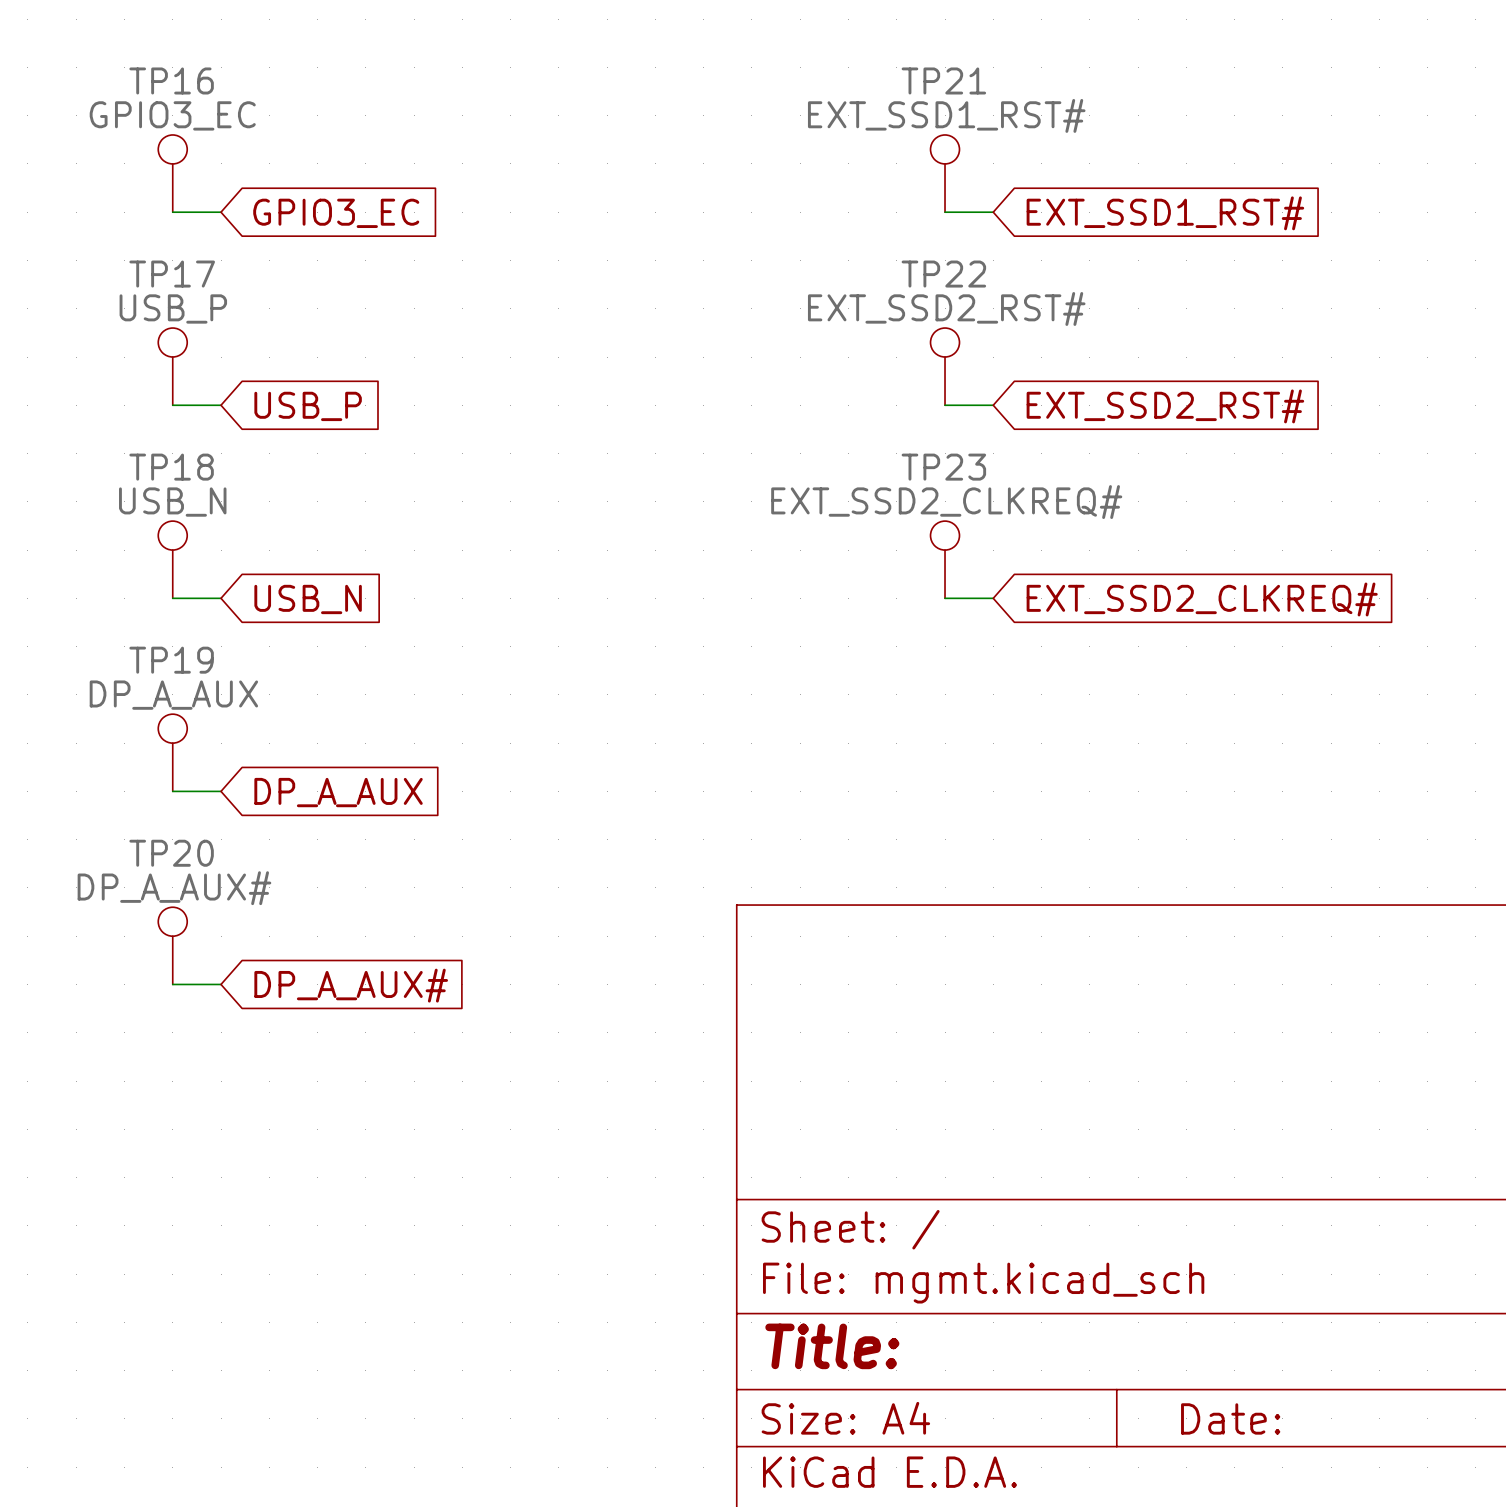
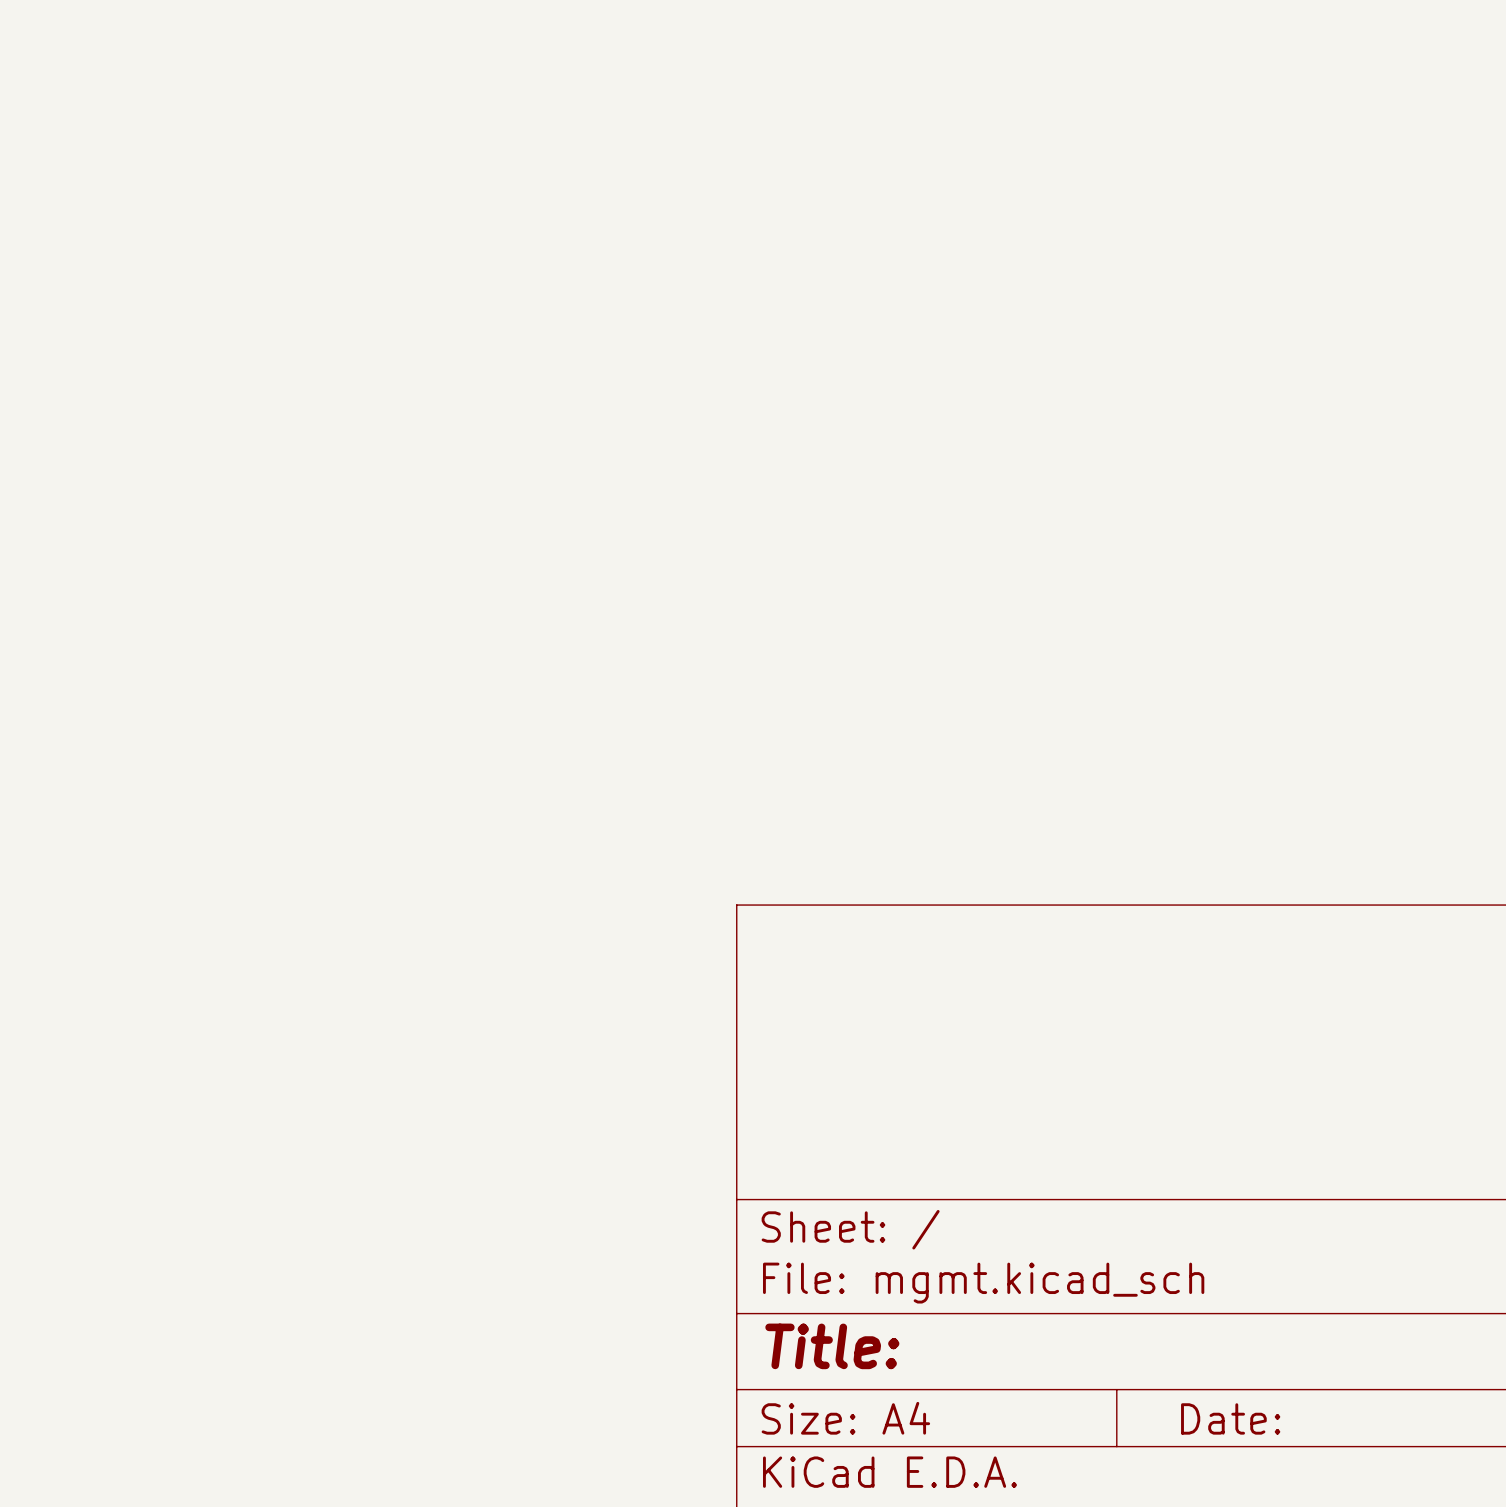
TP16: GPIO3_EC (172, 173) -> none
TP21: EXT_SSD1_RST# (945, 173) -> none
wire: (172, 212) (221, 212) -> none
wire: (945, 212) (993, 212) -> none
global label: GPIO3_EC (336, 213) -> none
global label: EXT_SSD1_RST# (1165, 213) -> none
TP17: USB_P (172, 366) -> none
TP22: EXT_SSD2_RST# (945, 366) -> none
wire: (172, 405) (221, 405) -> none
wire: (945, 405) (993, 405) -> none
global label: USB_P (308, 406) -> none
global label: EXT_SSD2_RST# (1165, 406) -> none
TP18: USB_N (172, 559) -> none
TP23: EXT_SSD2_CLKREQ# (945, 559) -> none
wire: (172, 598) (221, 598) -> none
wire: (945, 598) (993, 598) -> none
global label: USB_N (308, 599) -> none
global label: EXT_SSD2_CLKREQ# (1202, 599) -> none
TP19: DP_A_AUX (172, 752) -> none
wire: (172, 791) (221, 791) -> none
global label: DP_A_AUX (338, 792) -> none
TP20: DP_A_AUX# (172, 945) -> none
wire: (172, 984) (221, 984) -> none
global label: DP_A_AUX# (351, 985) -> none

